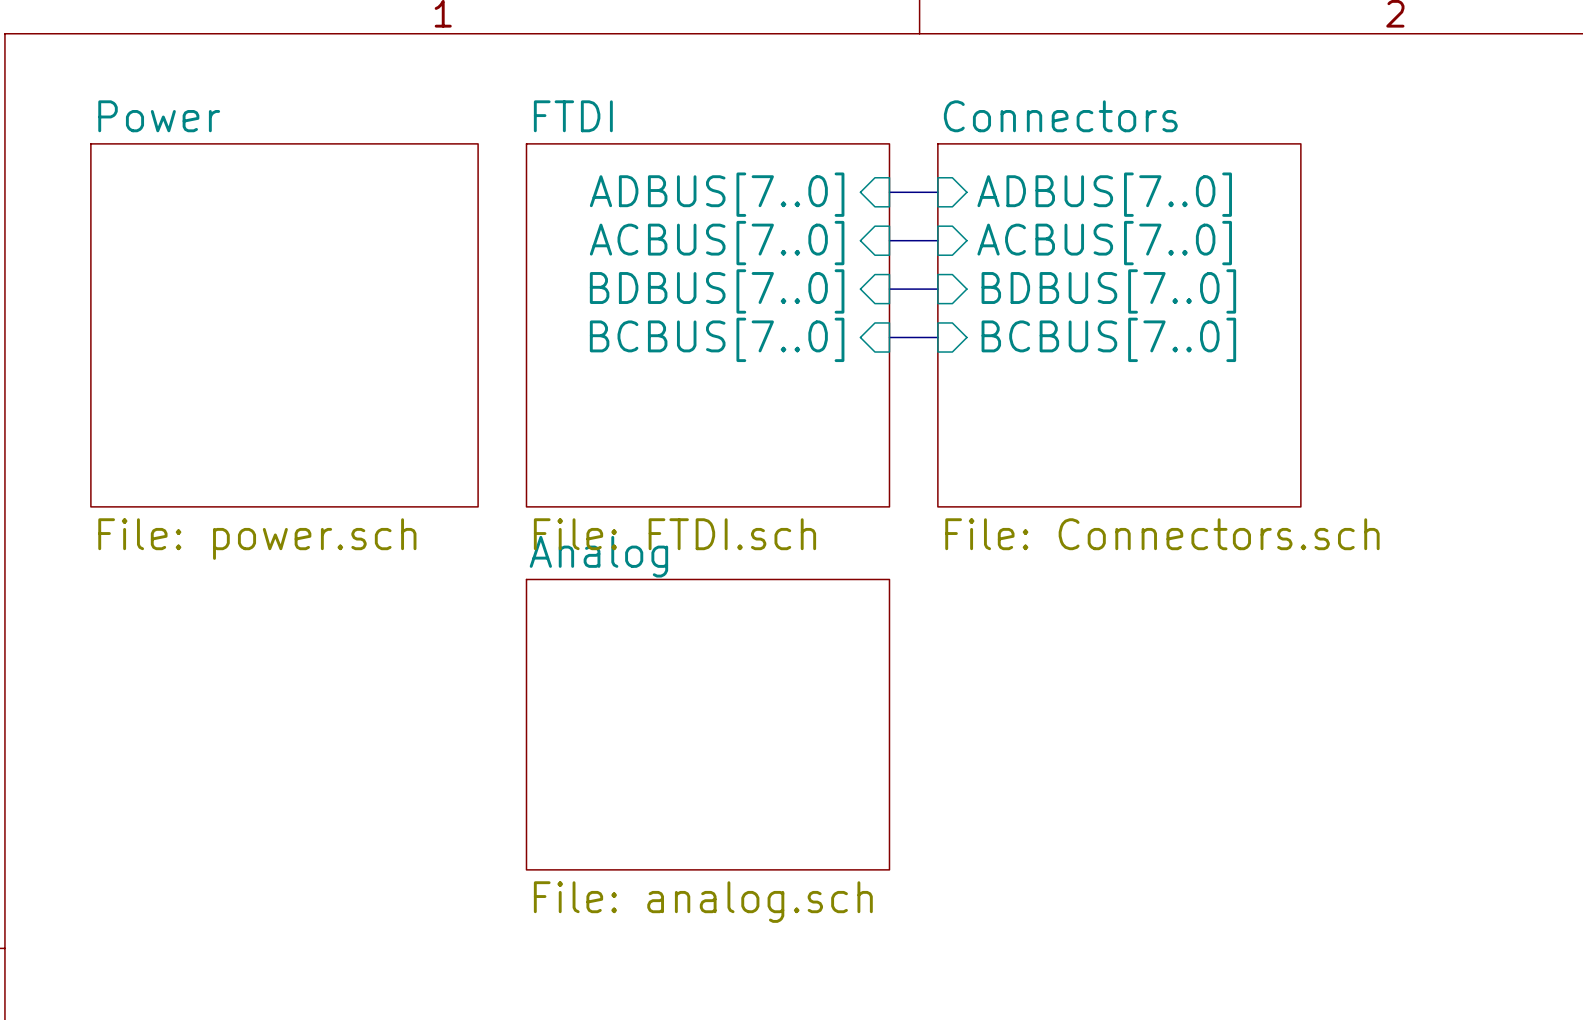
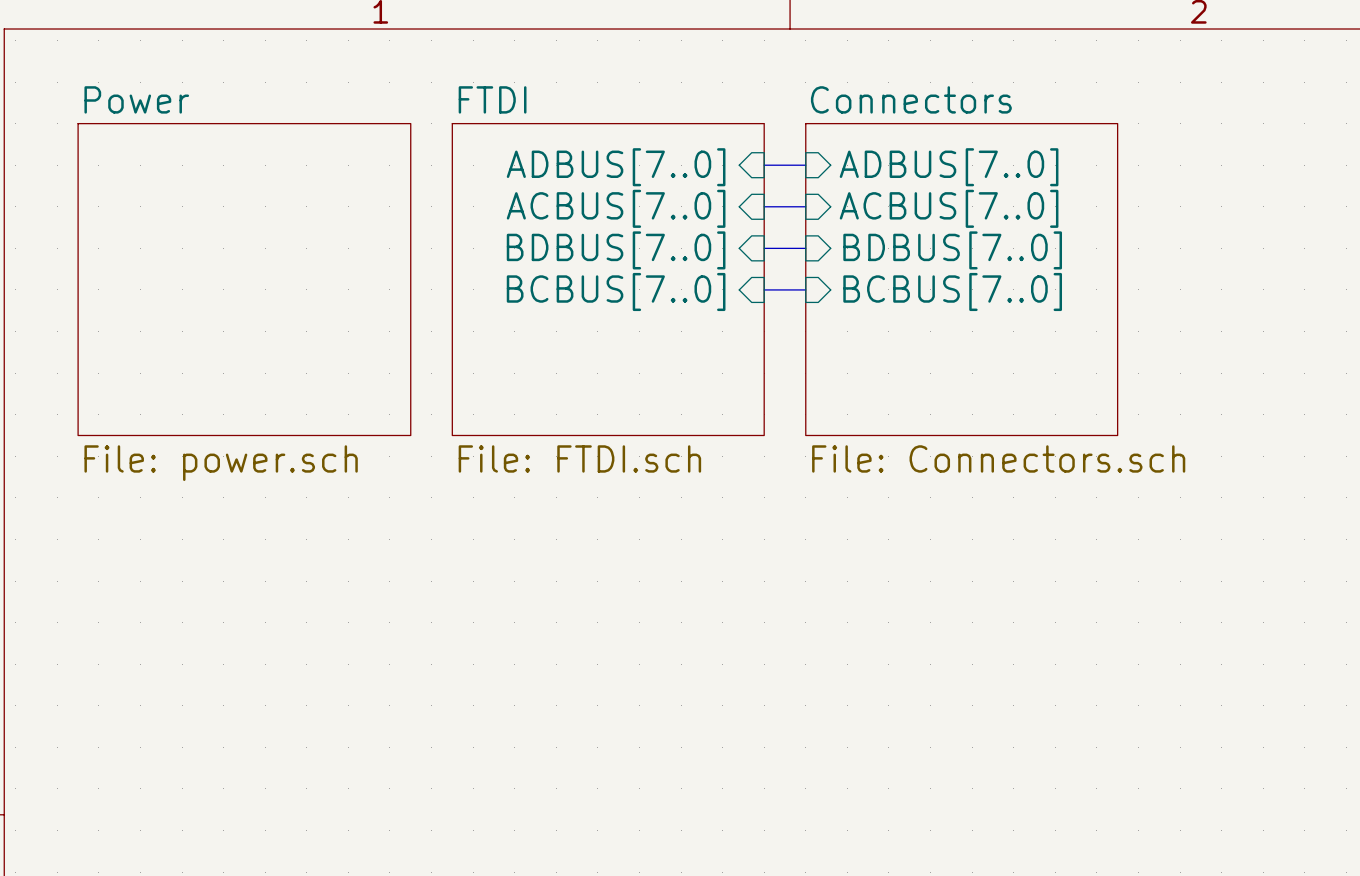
sheet Analog: File: analog.sch (707, 724) -> none

